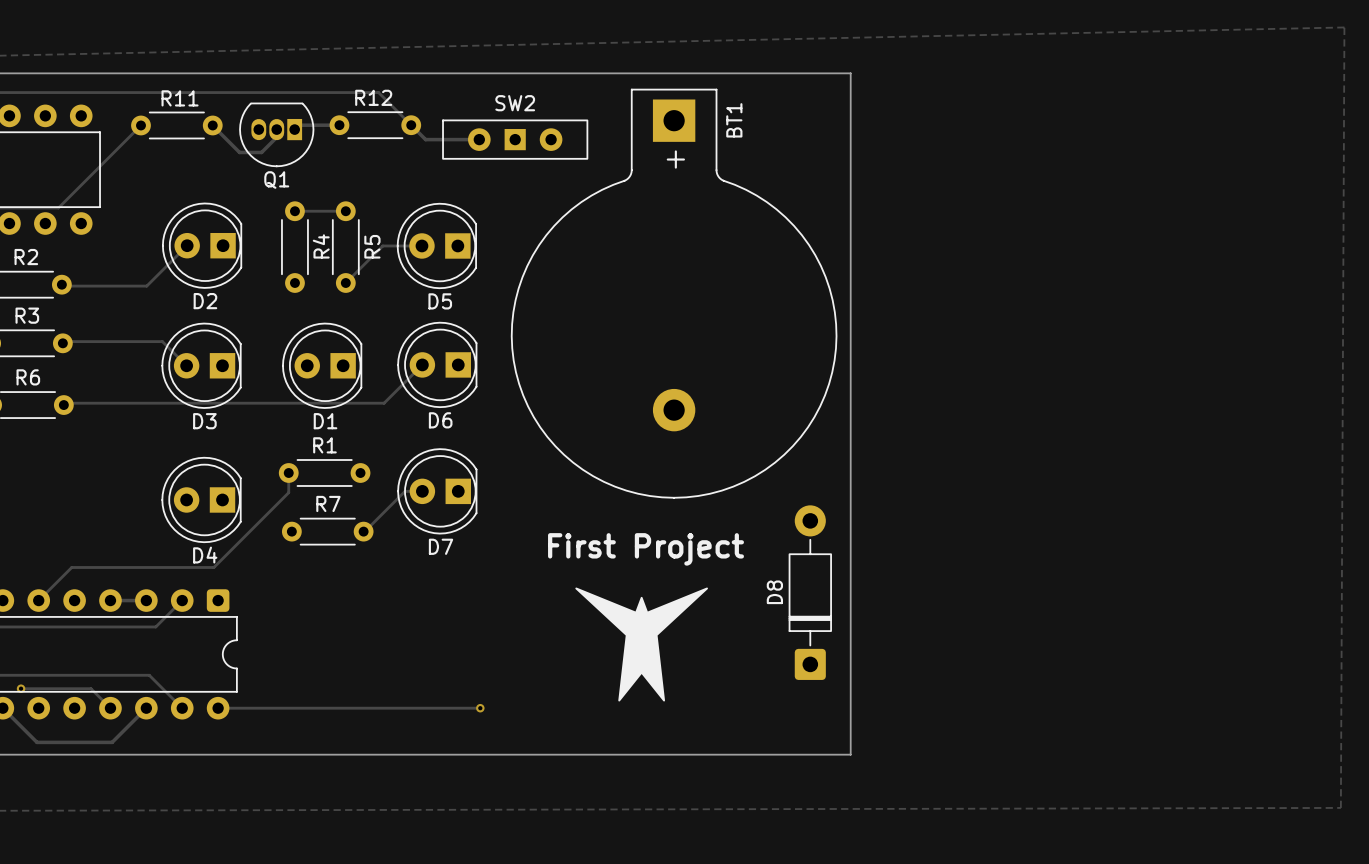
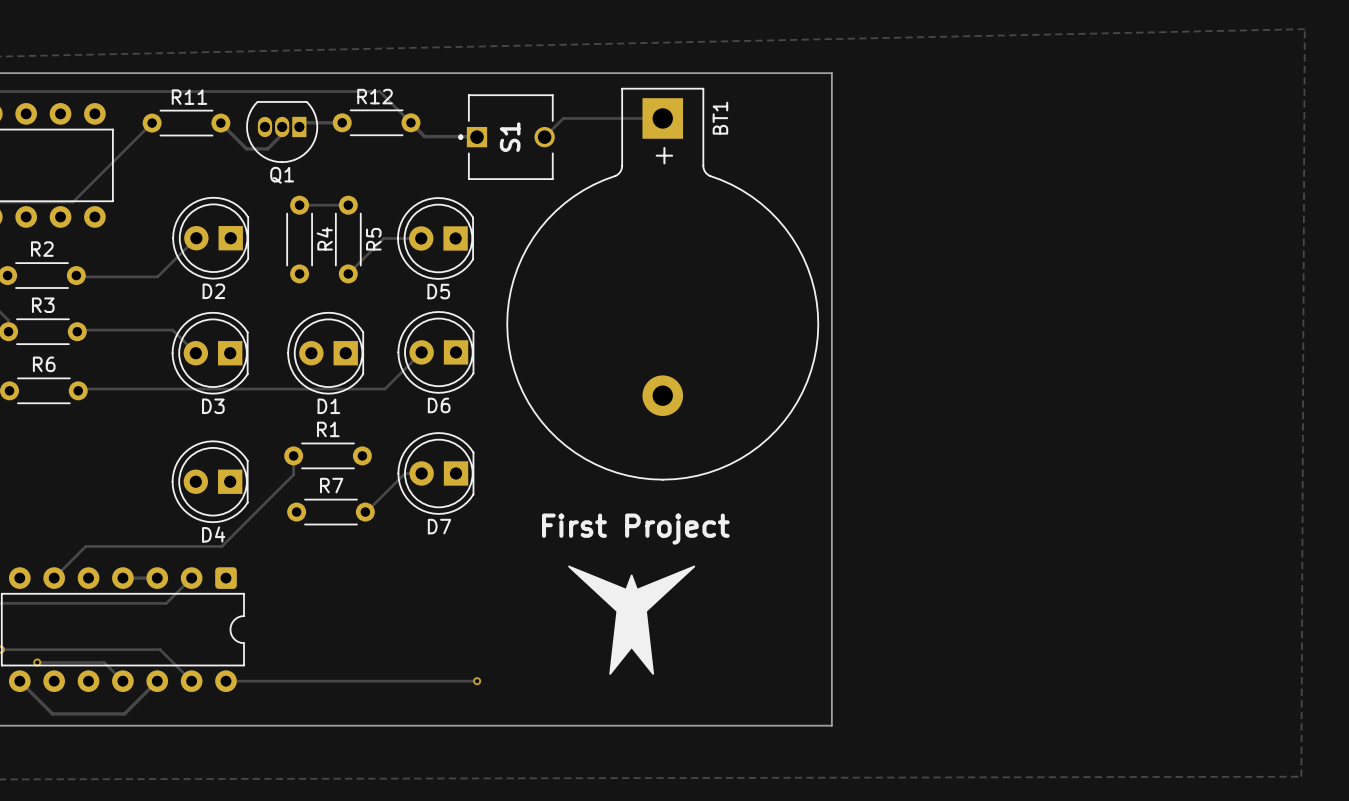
track: none -> (662, 118) (563, 118) (544, 137)
SW2: (515, 139) -> none
S1: none -> (506, 137)
D8: (810, 592) -> none

